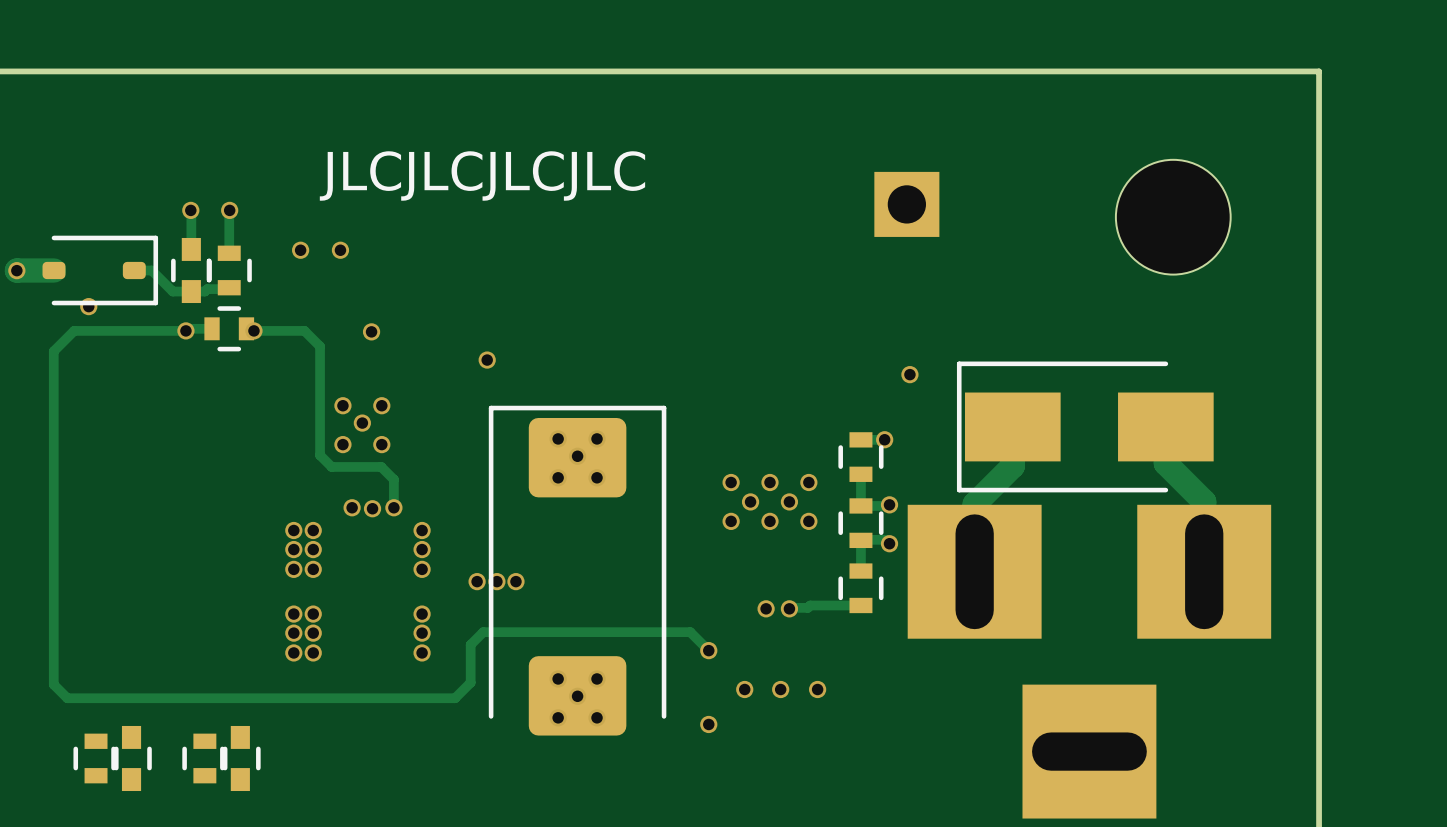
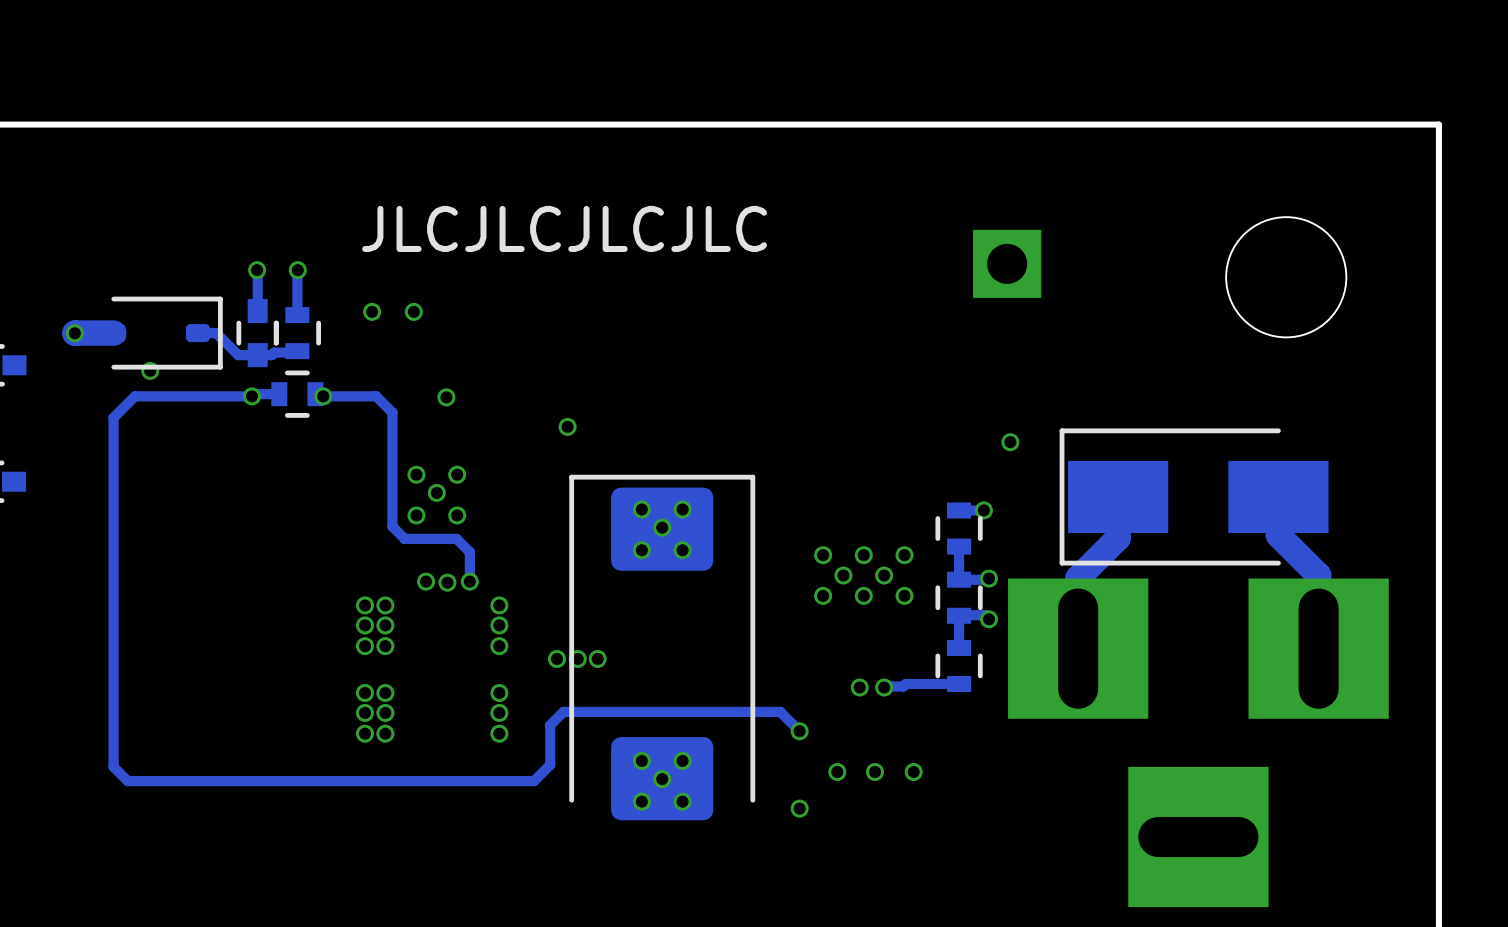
part: (96, 758) -> none
part: (131, 758) -> none
part: (204, 758) -> none
part: (240, 758) -> none

